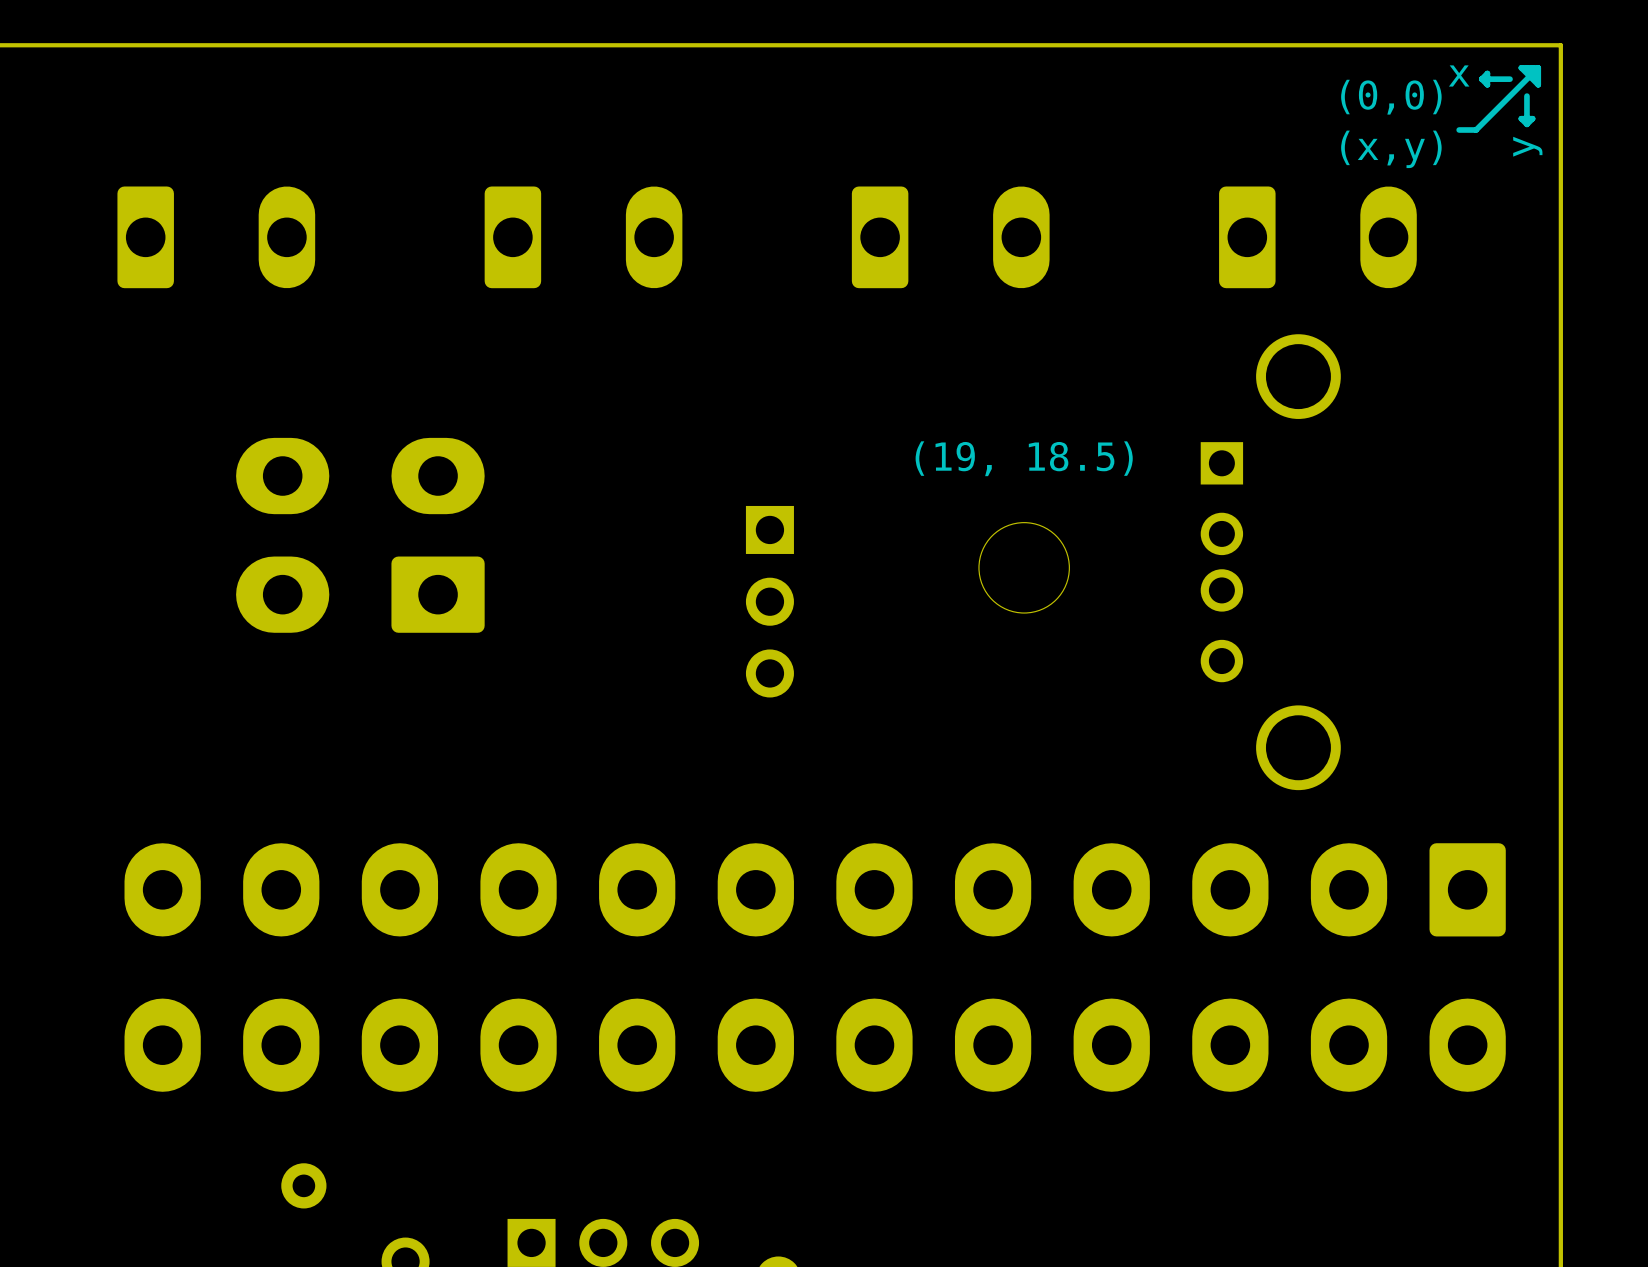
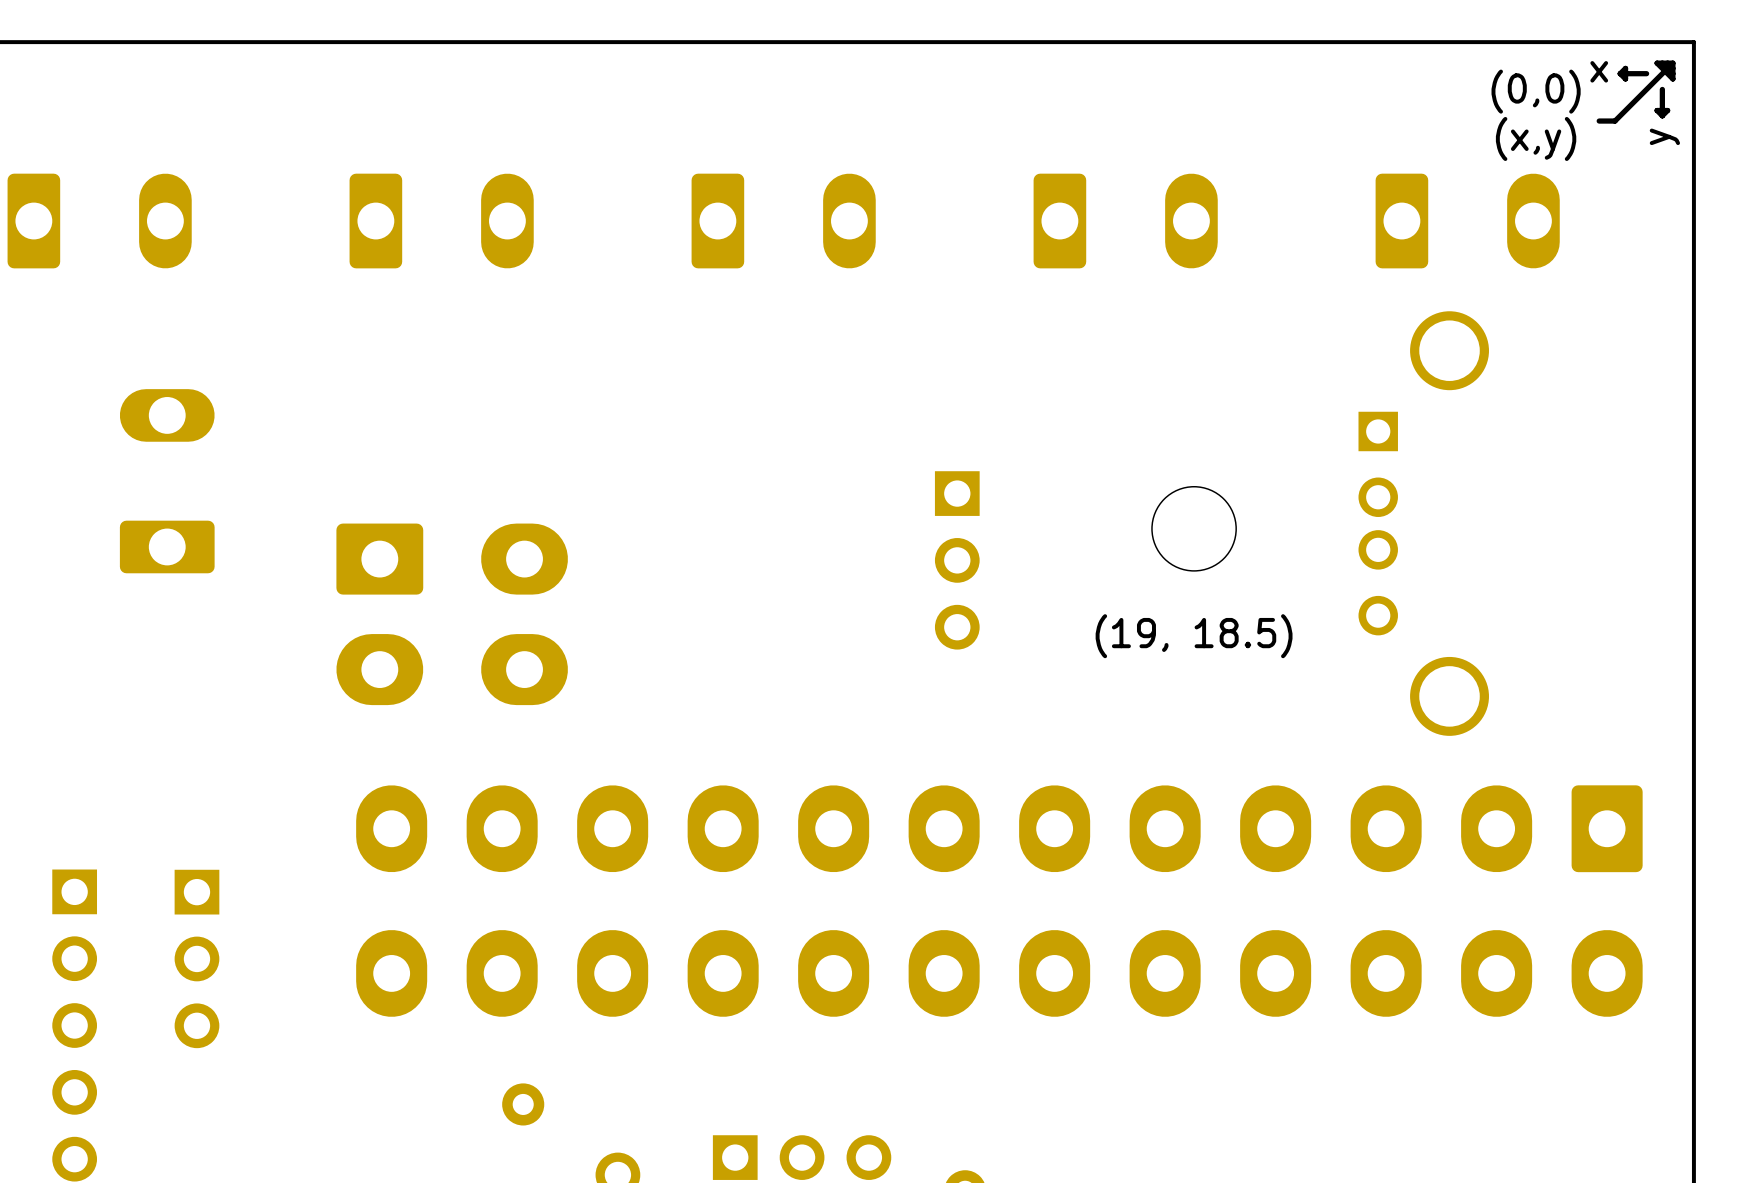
text position: (19, 18.5) (1024, 458) -> (19, 18.5) (1194, 636)
part rotation: 0° (360, 535) -> 180° (452, 614)
part position: (360, 535) -> (452, 614)

